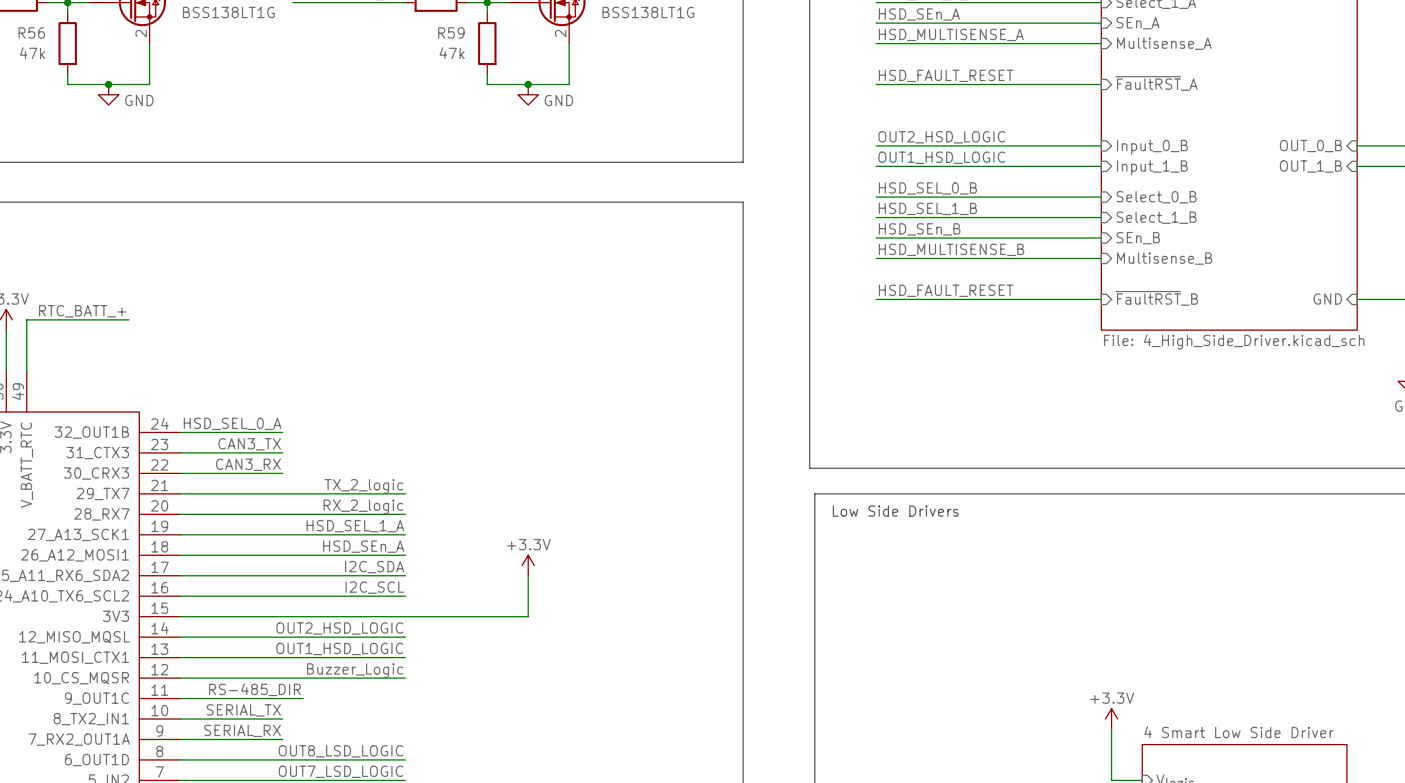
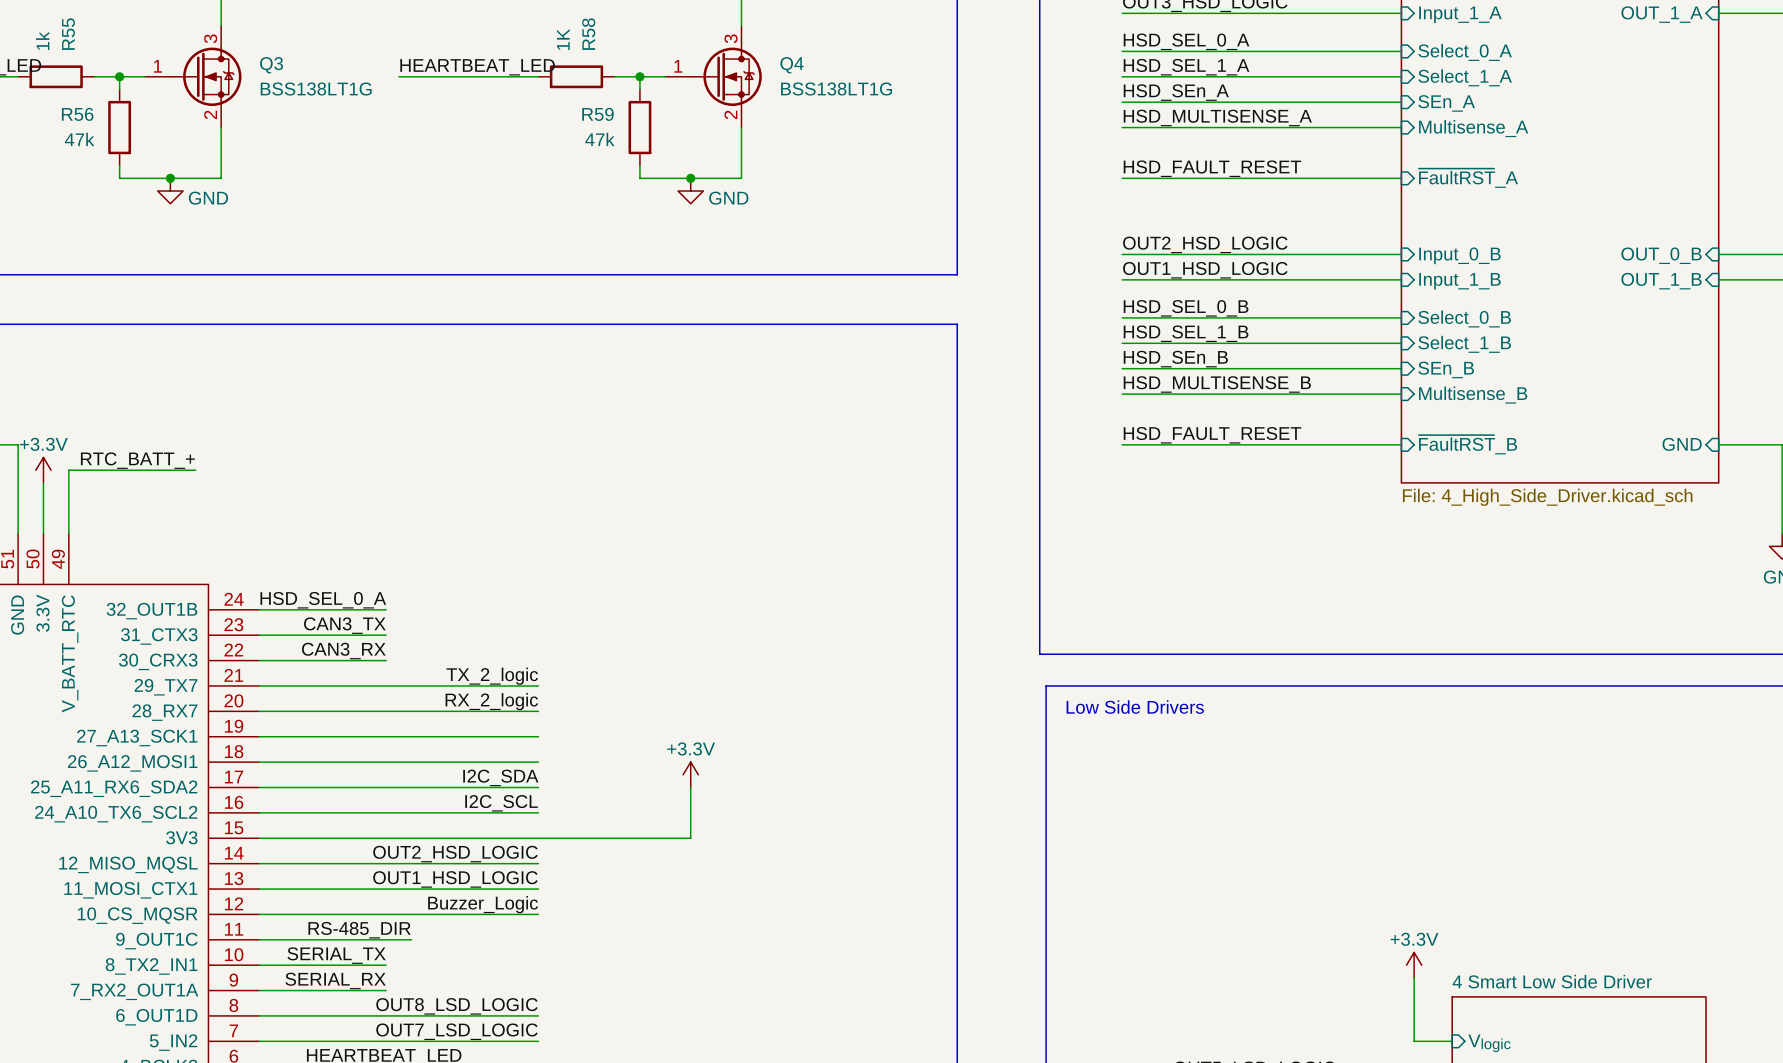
label: HSD_SEL_1_A (355, 526) -> none
label: HSD_SEn_A (363, 546) -> none

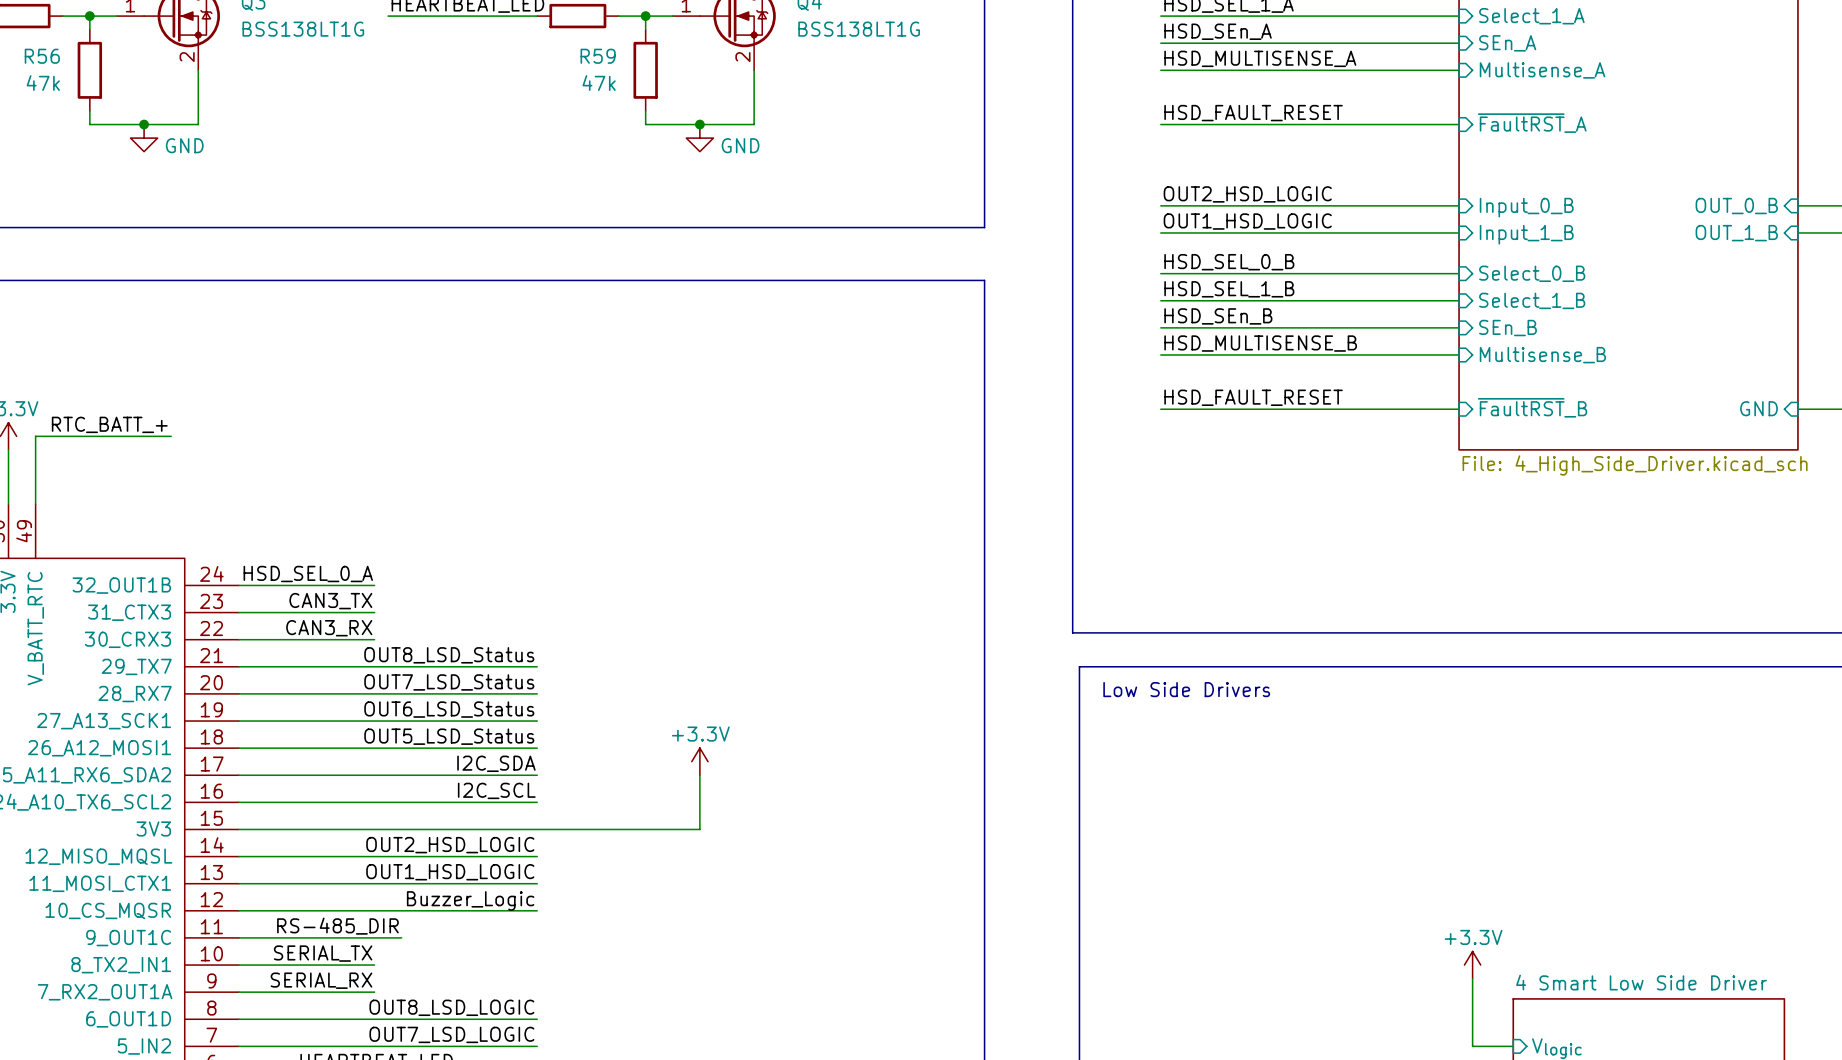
label: TX_2_logic (492, 676) -> OUT8_LSD_Status (449, 655)
label: RX_2_logic (491, 701) -> OUT7_LSD_Status (449, 682)
label: none -> OUT6_LSD_Status (449, 709)
label: none -> OUT5_LSD_Status (449, 736)

